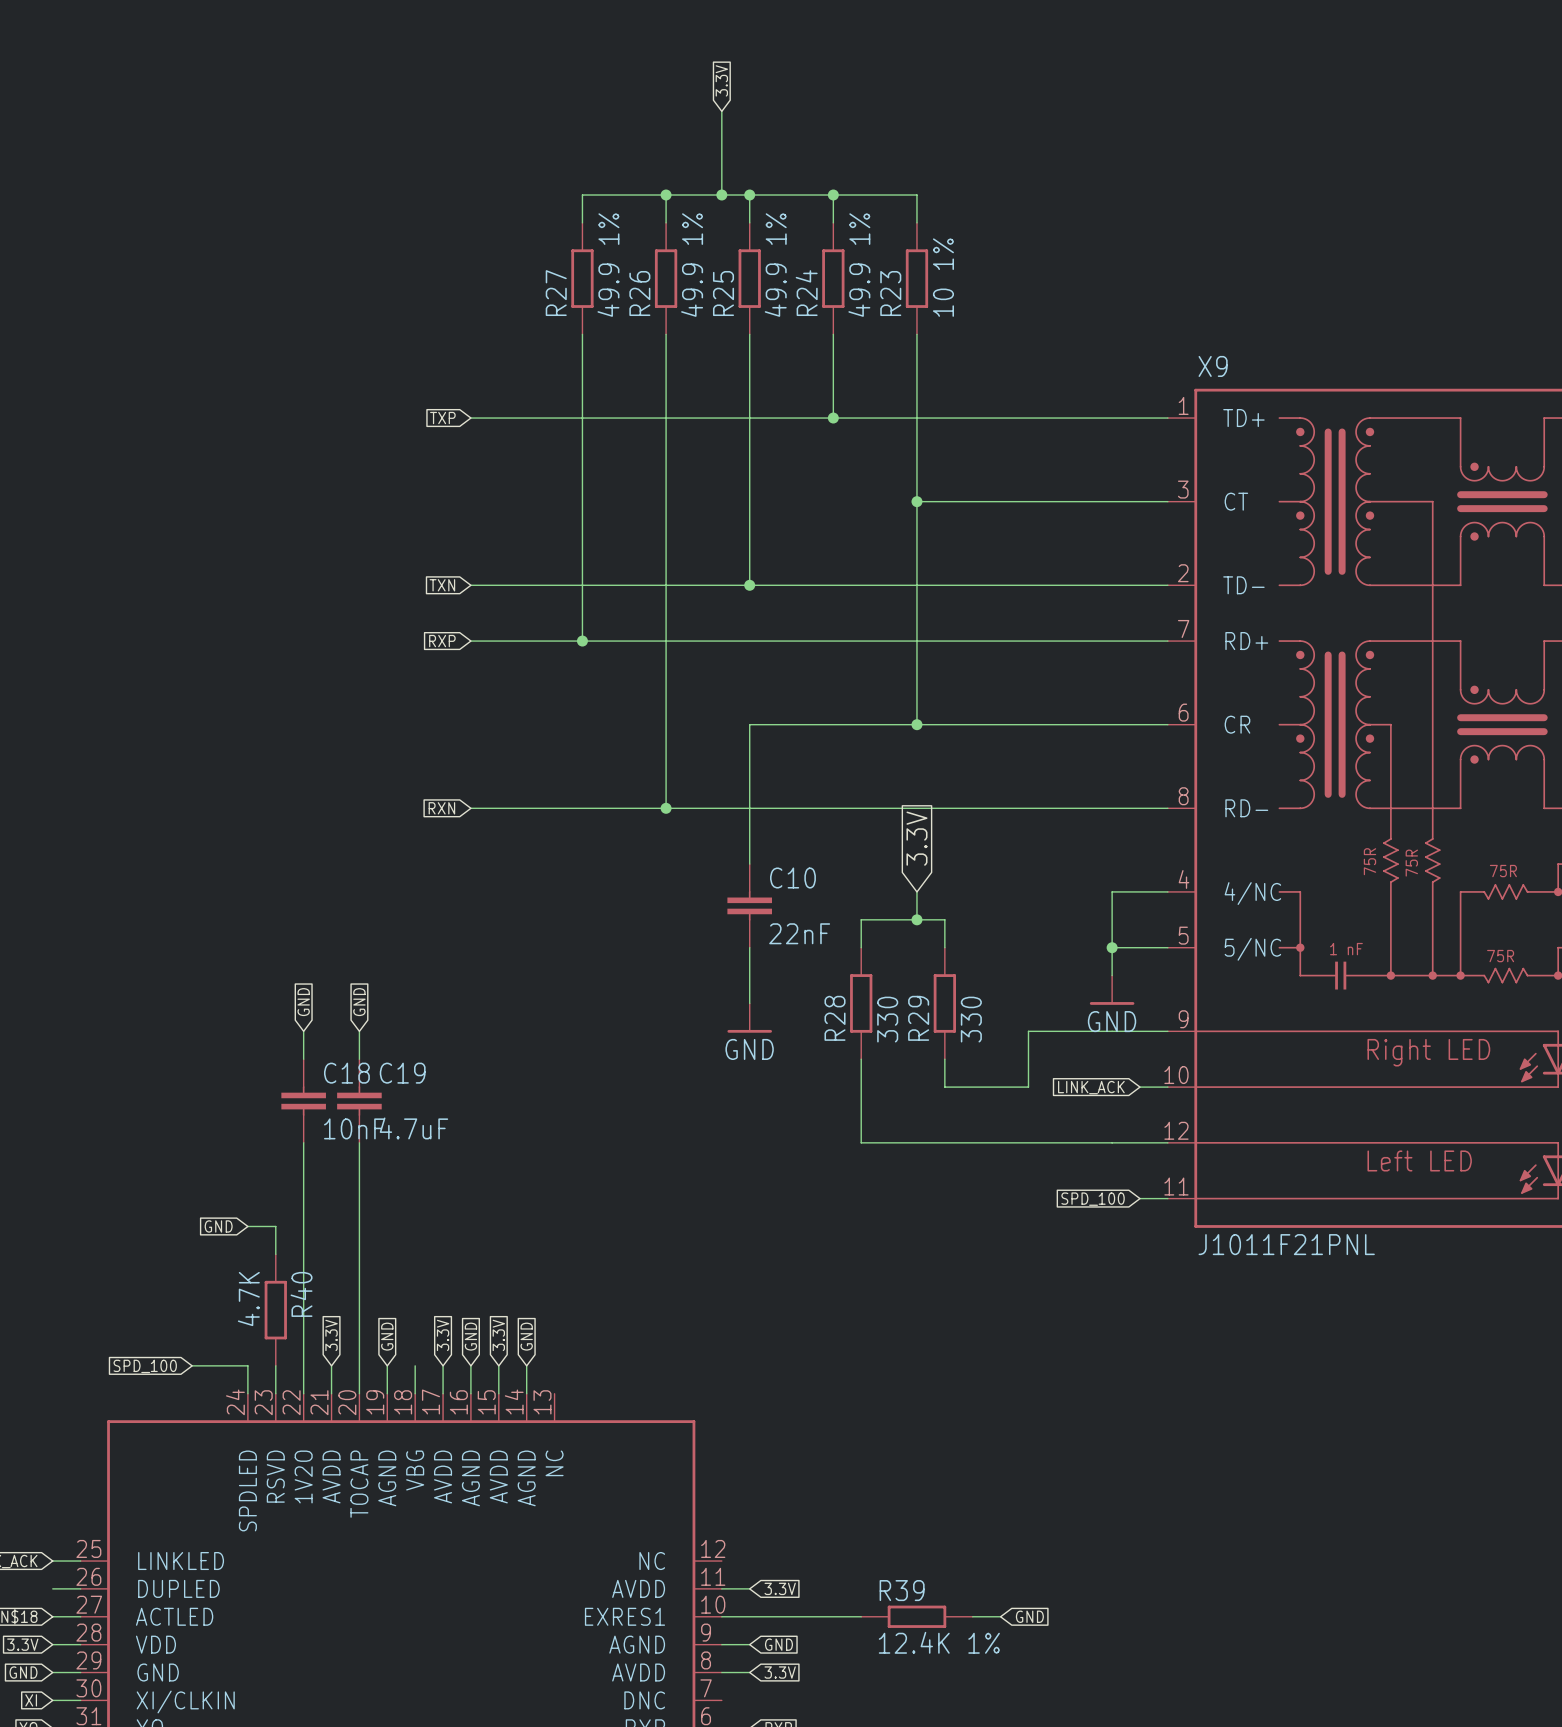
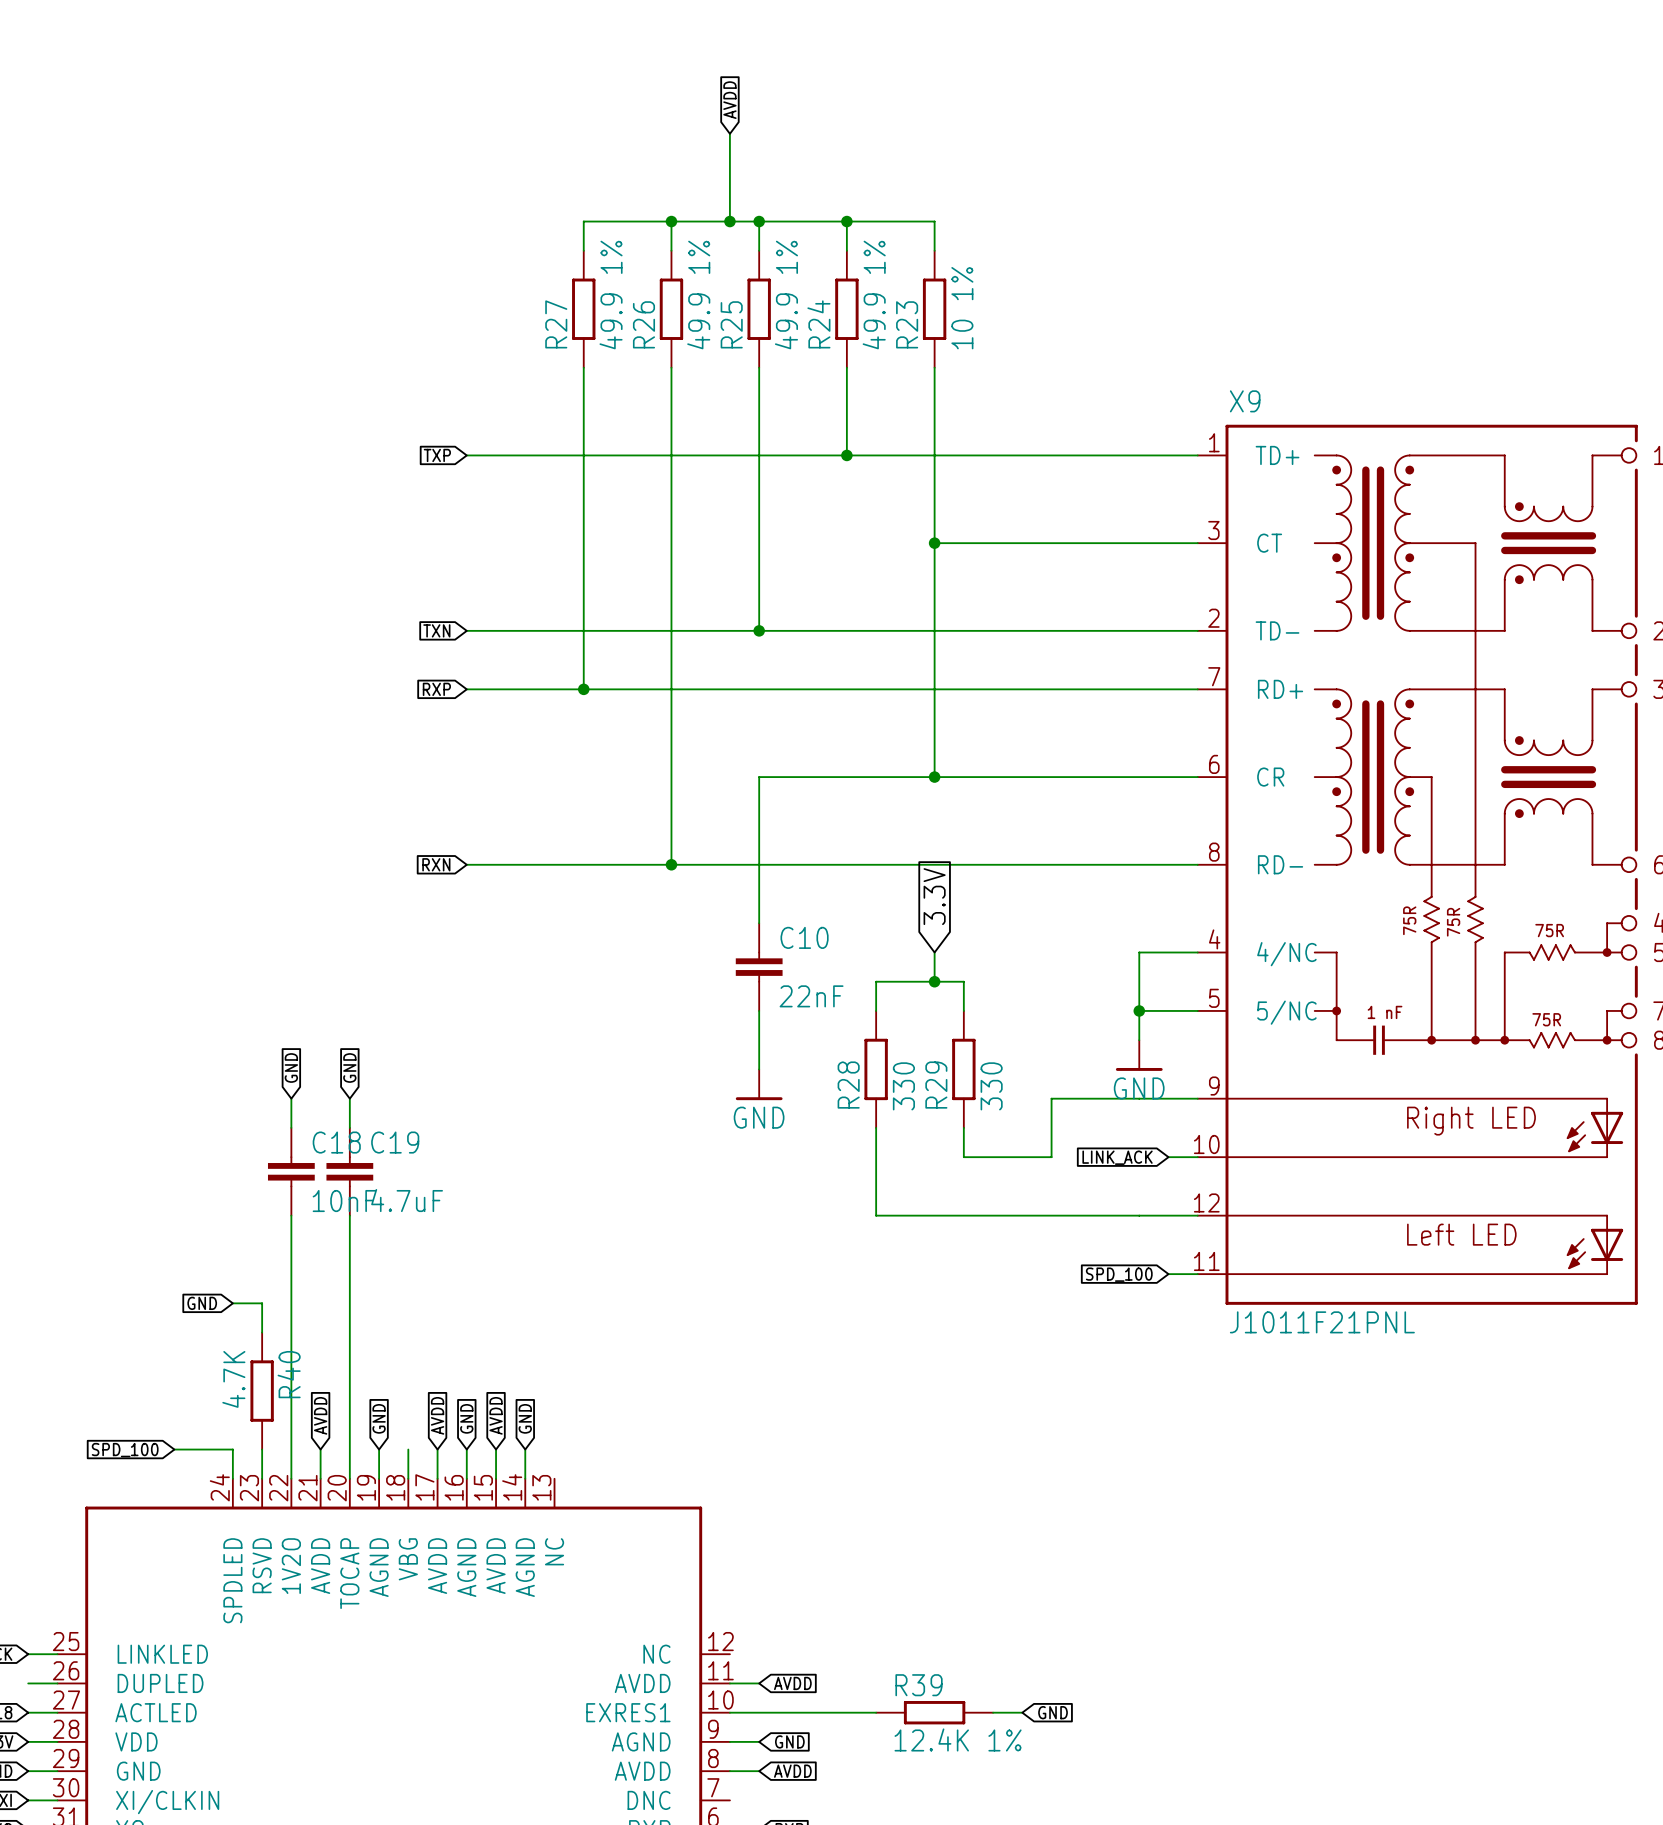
global label: 3.3V (721, 80) -> AVDD (729, 100)
global label: 3.3V (331, 1335) -> AVDD (320, 1415)
global label: 3.3V (443, 1335) -> AVDD (437, 1415)
global label: 3.3V (498, 1335) -> AVDD (496, 1415)
global label: 3.3V (780, 1588) -> AVDD (792, 1683)
global label: 3.3V (780, 1672) -> AVDD (792, 1771)

